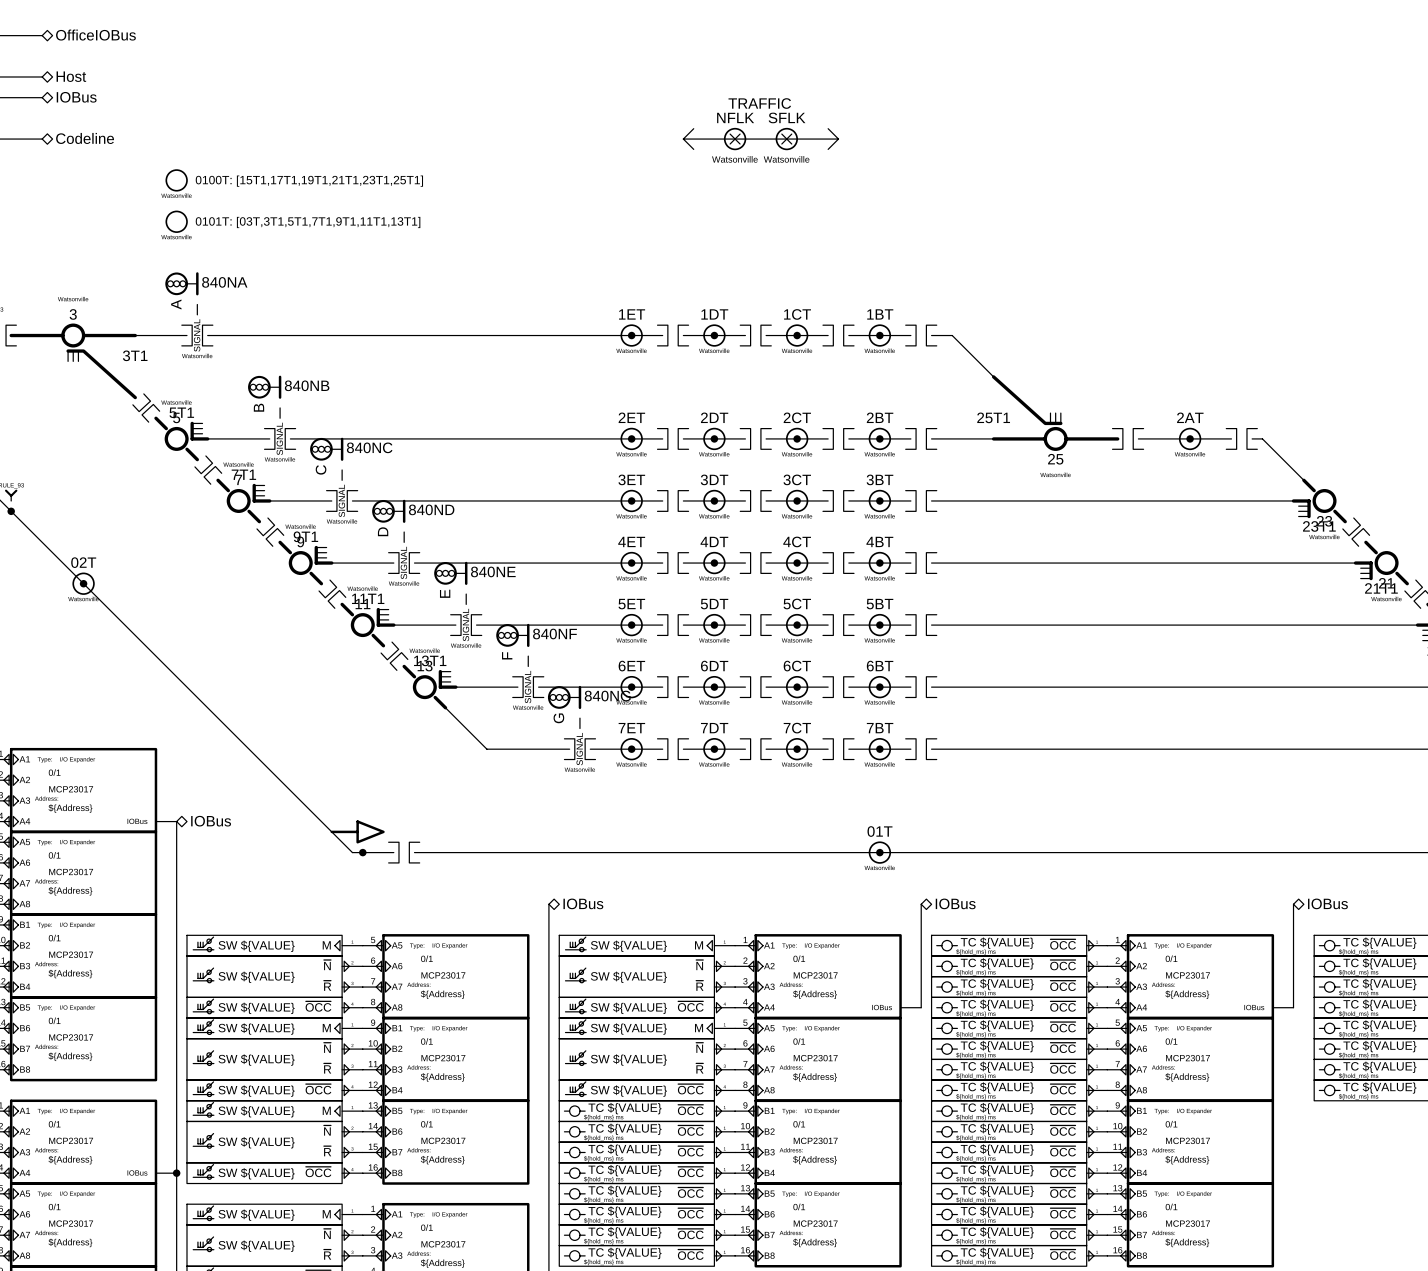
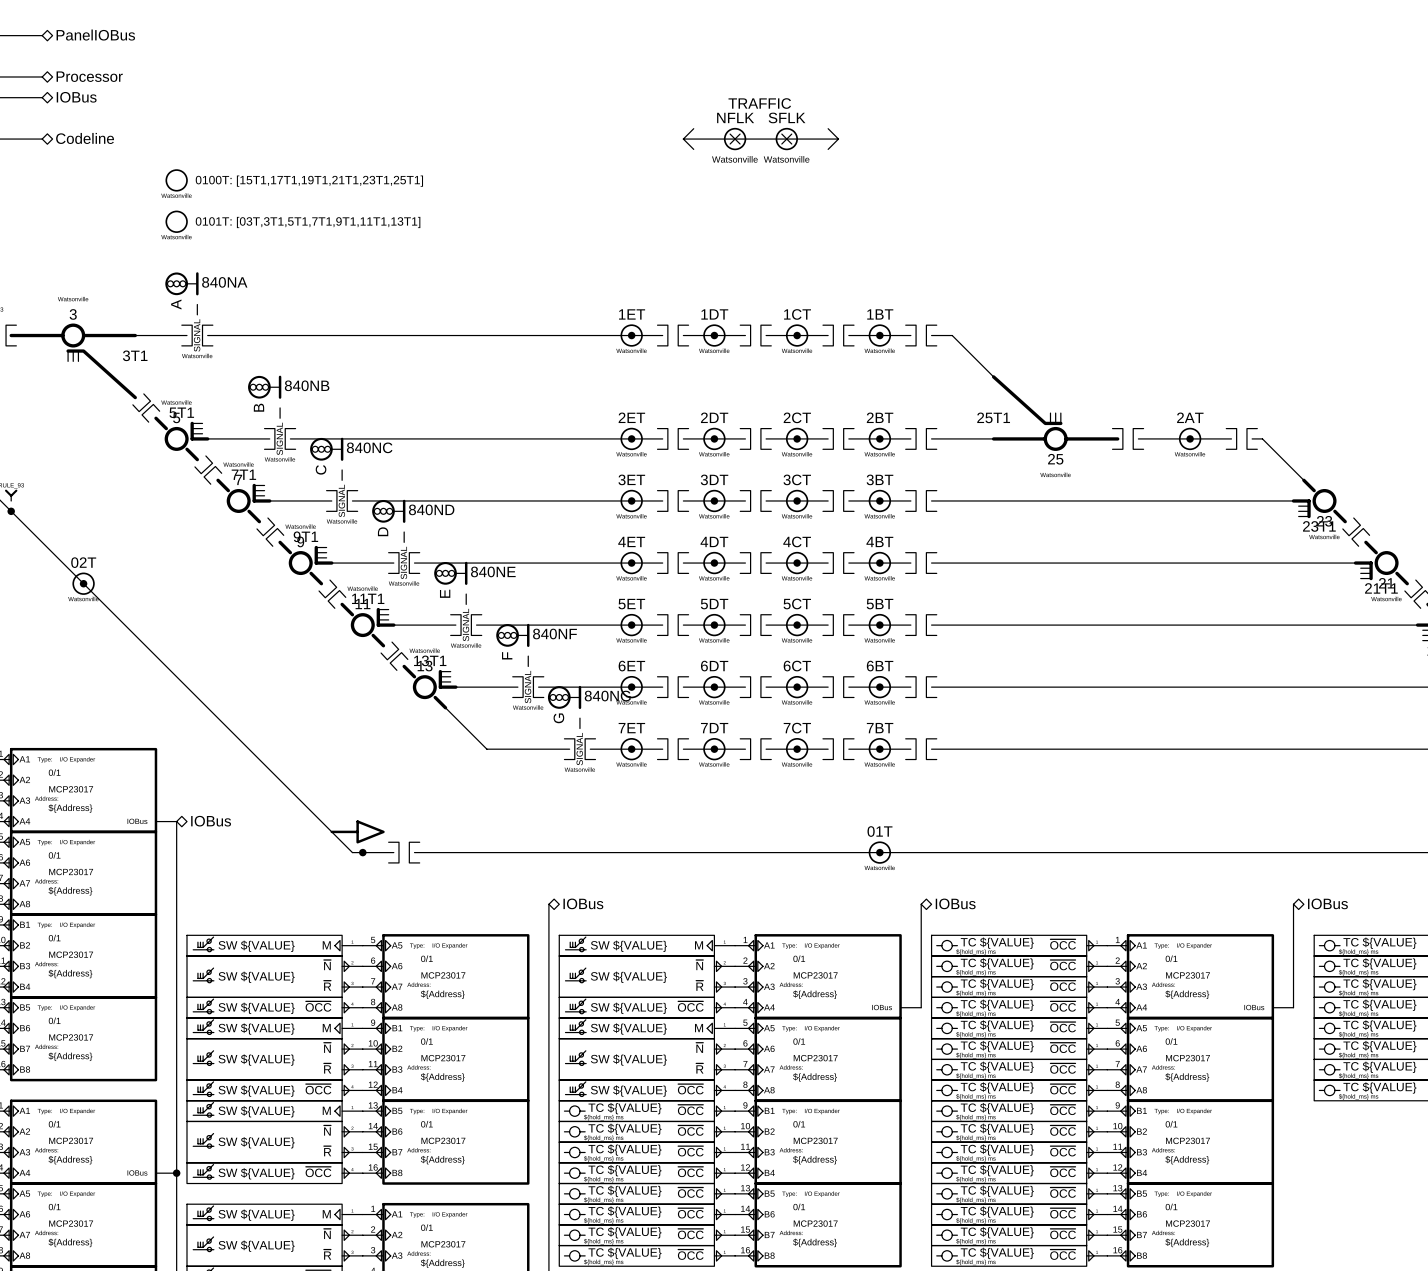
hierarchical label: OfficeIOBus (95, 35) -> PanelIOBus (95, 35)
hierarchical label: Host (71, 76) -> Processor (89, 76)

